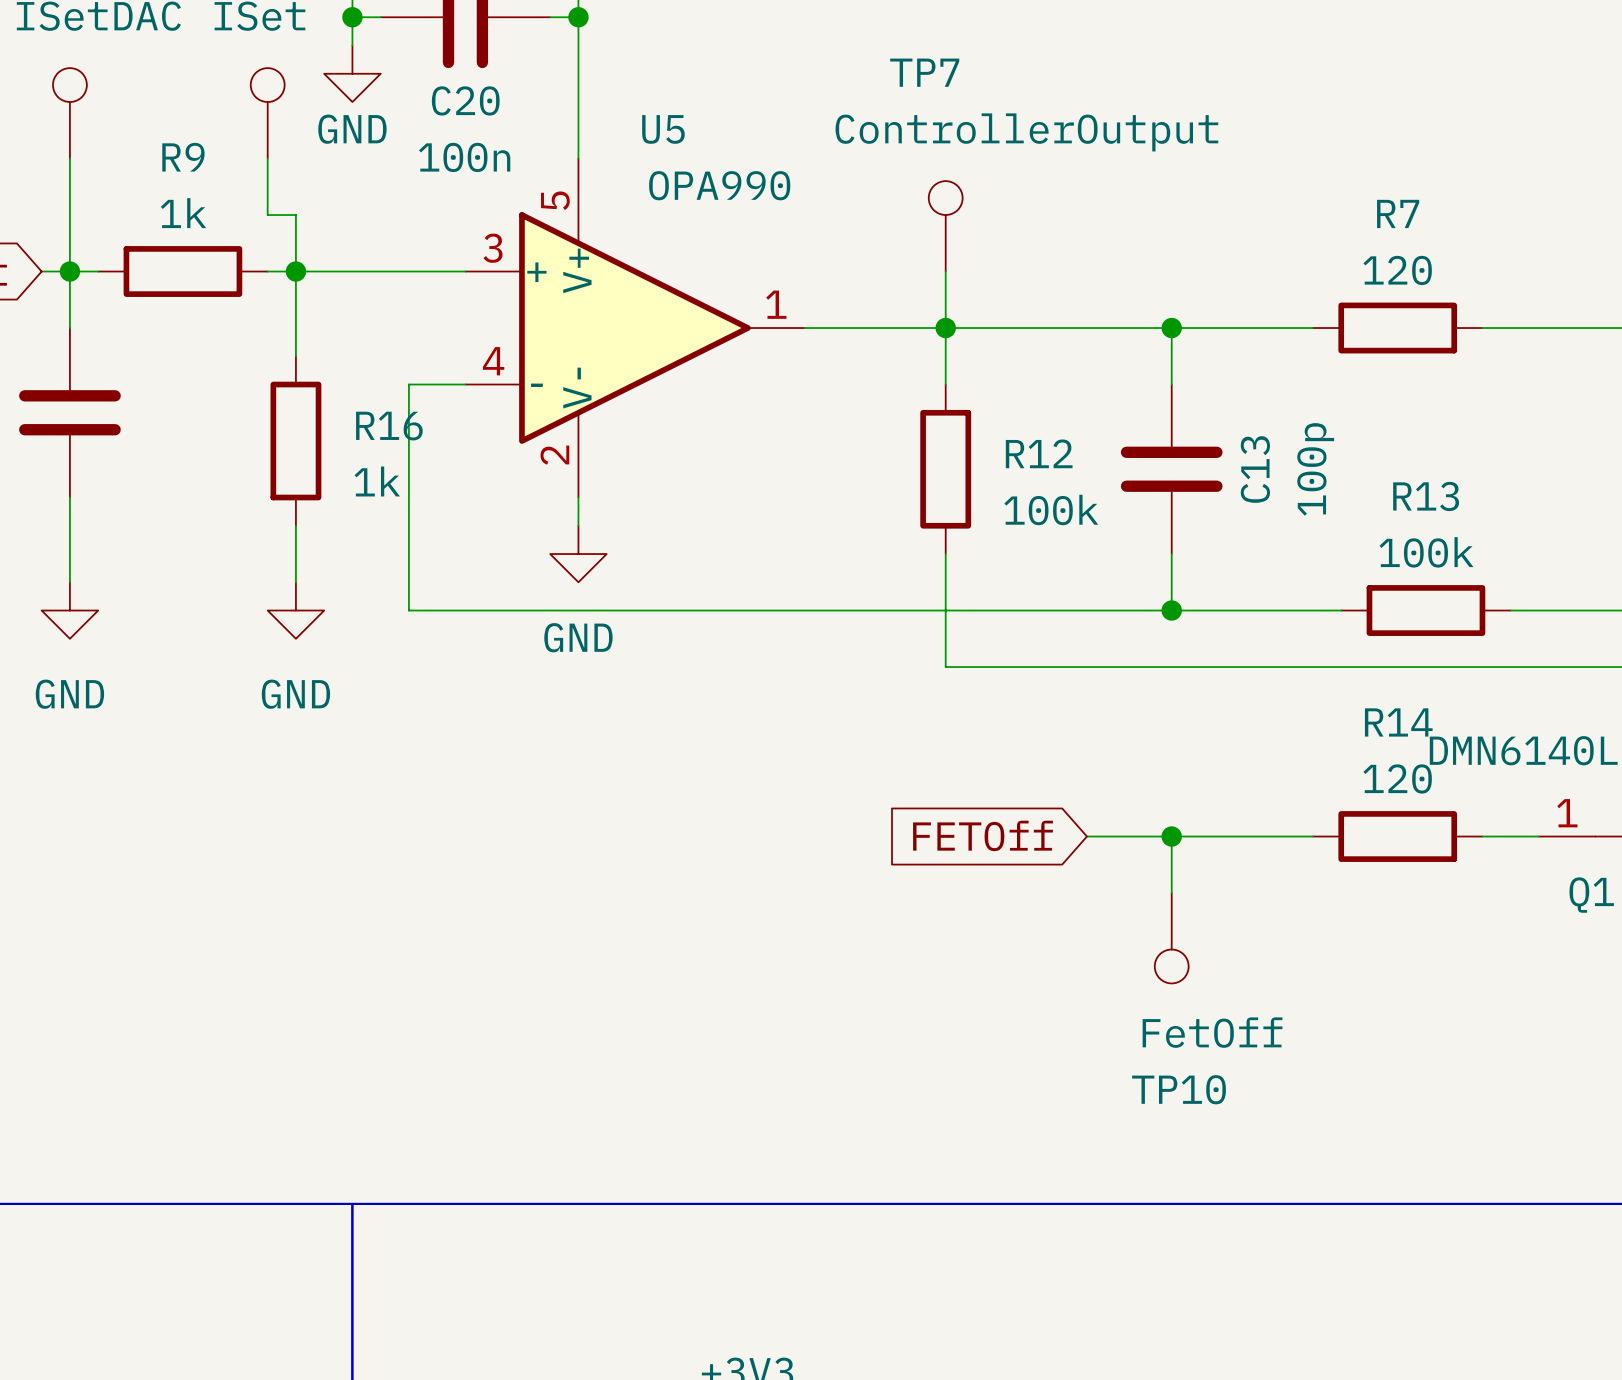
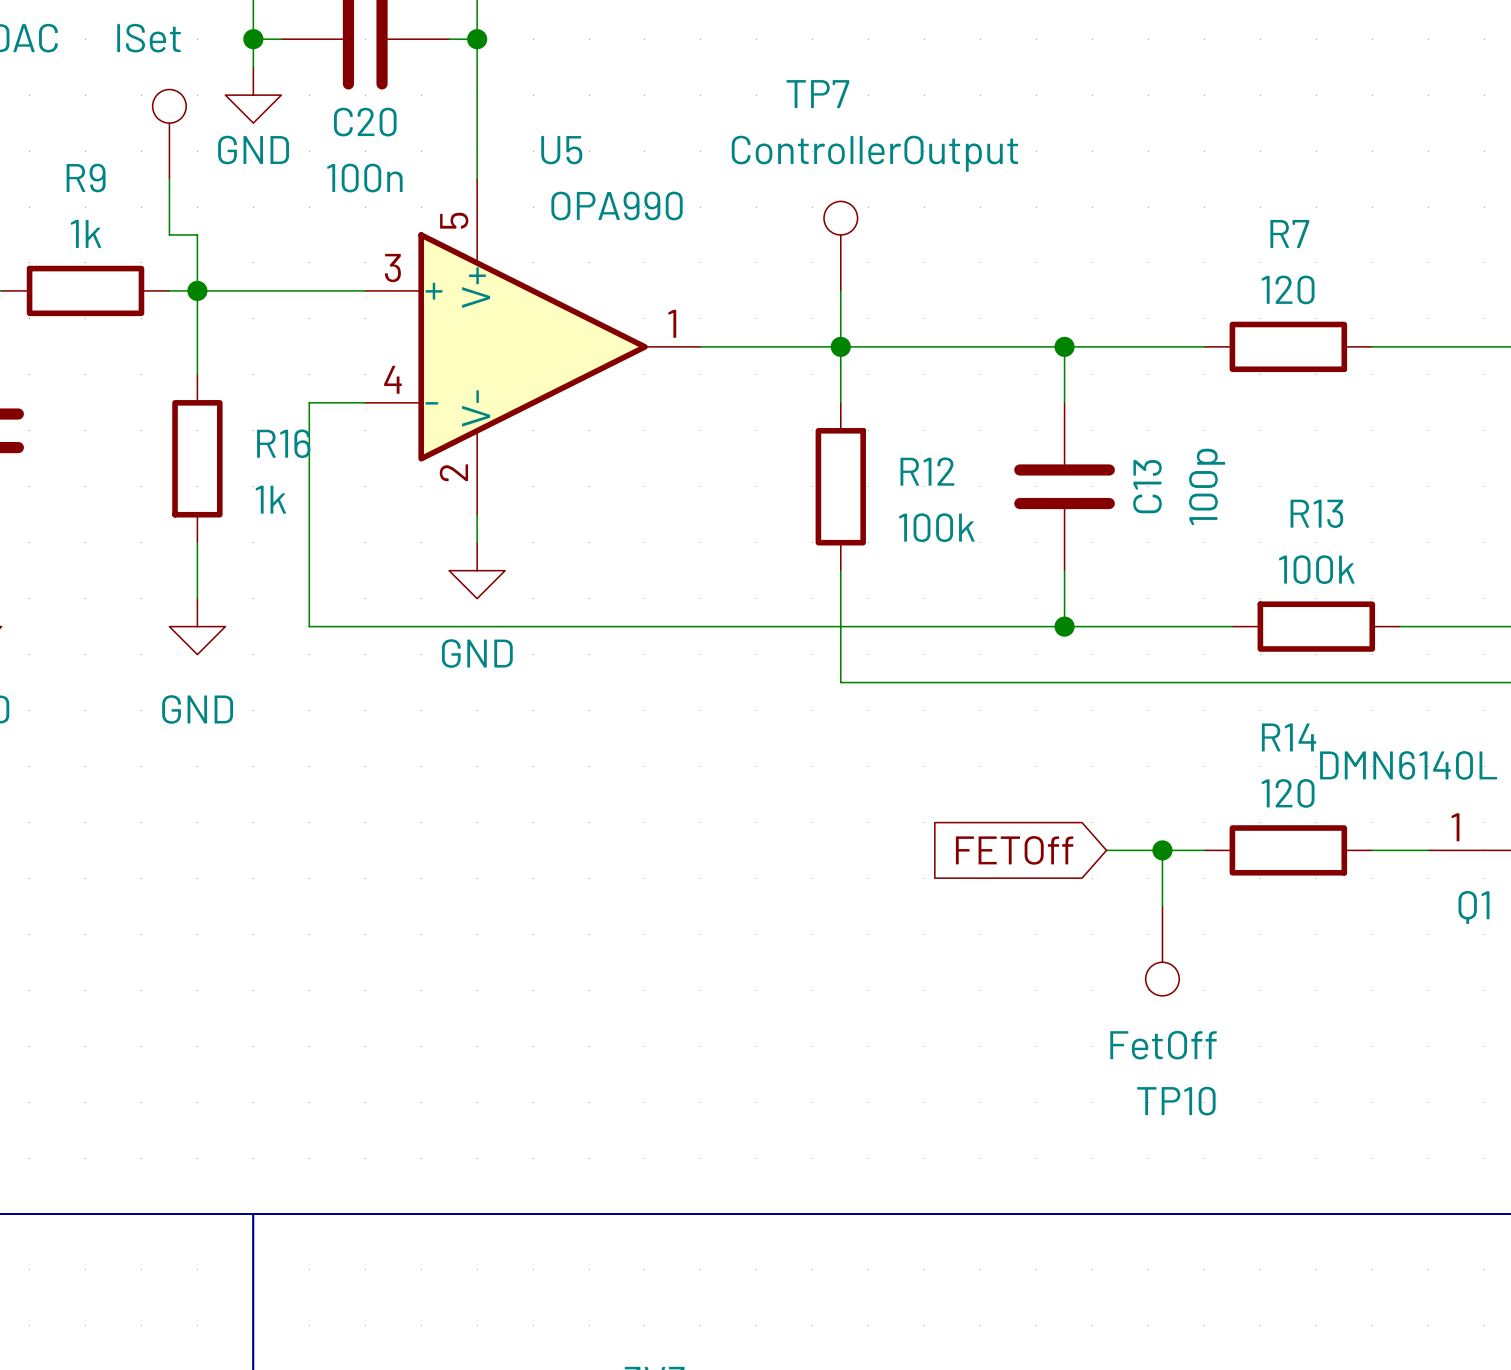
global label position: FETOff (983, 835) -> FETOff (1014, 850)
wire: (1086, 836) (1214, 836) -> none
wire: (1171, 836) (1171, 893) -> (1162, 850) (1162, 906)
junction position: (1171, 836) -> (1162, 850)
TP10 position: (1171, 938) -> (1162, 951)
TP10 value position: FetOff (1212, 1032) -> FetOff (1163, 1045)

